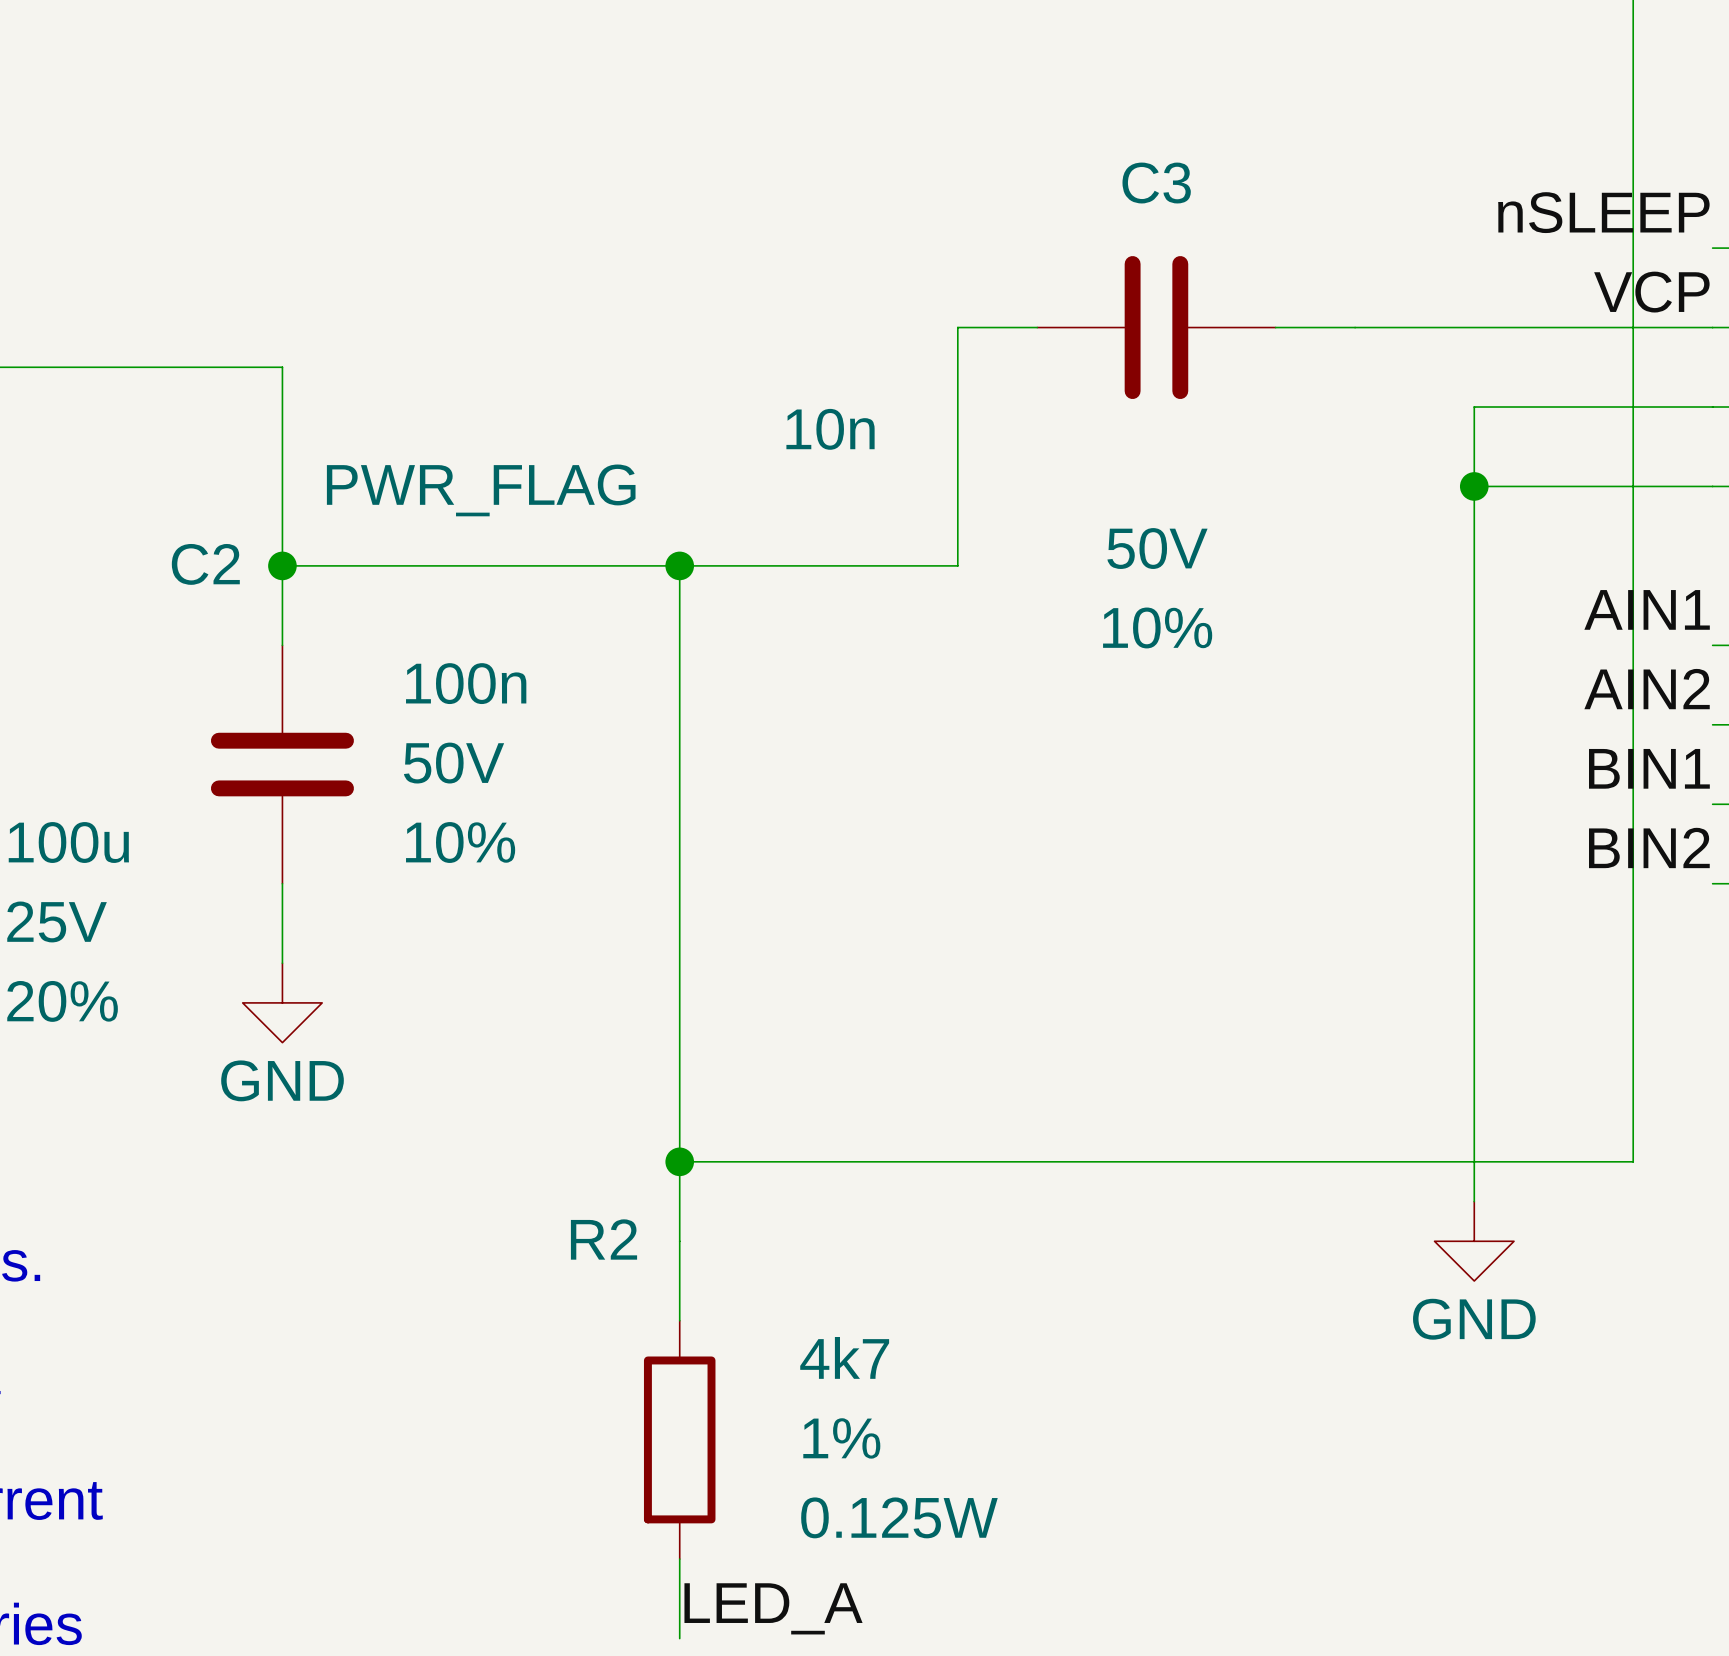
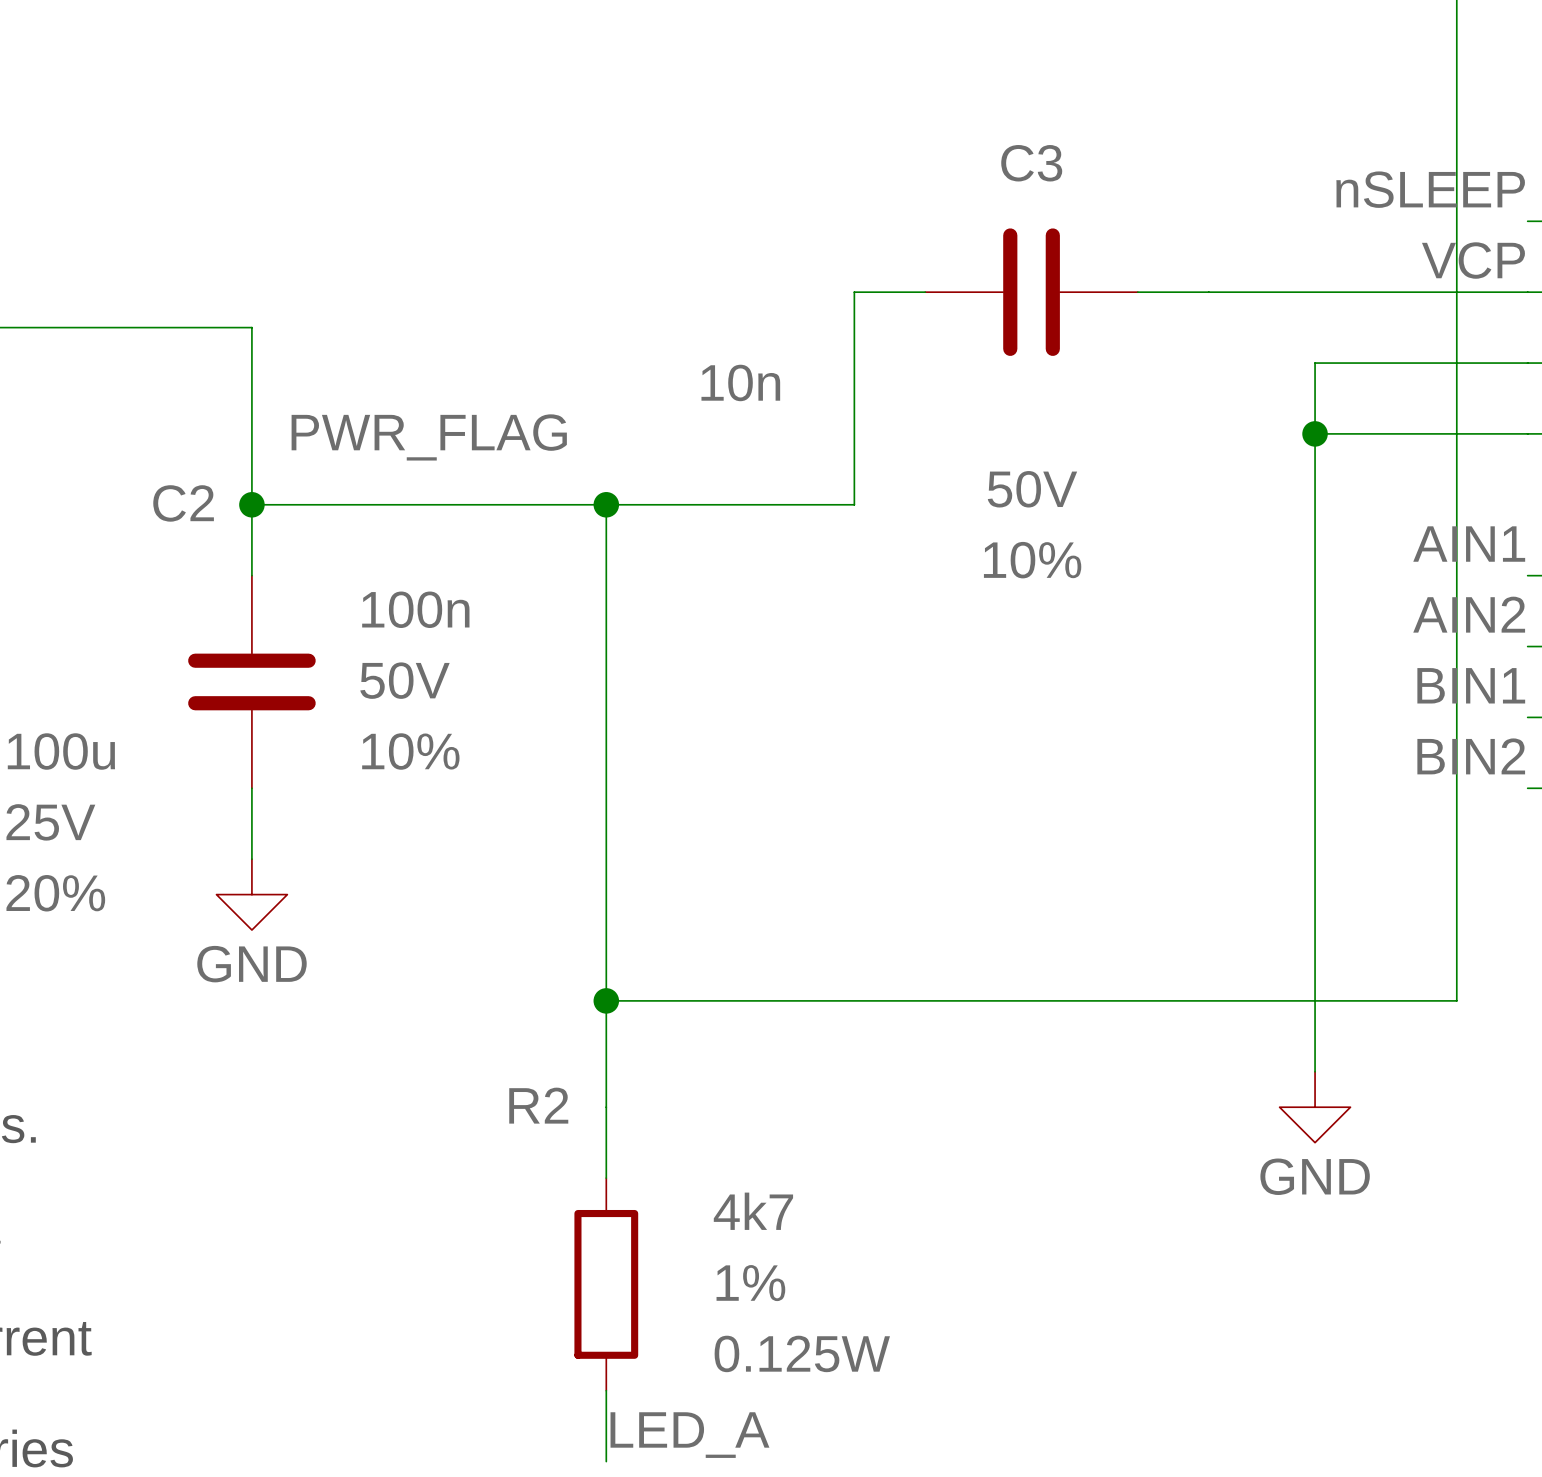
wire: (1633, 1122) (1633, 1161) (679, 1161) -> (1456, 1000) (606, 1000)
junction position: (679, 1161) -> (606, 1000)

